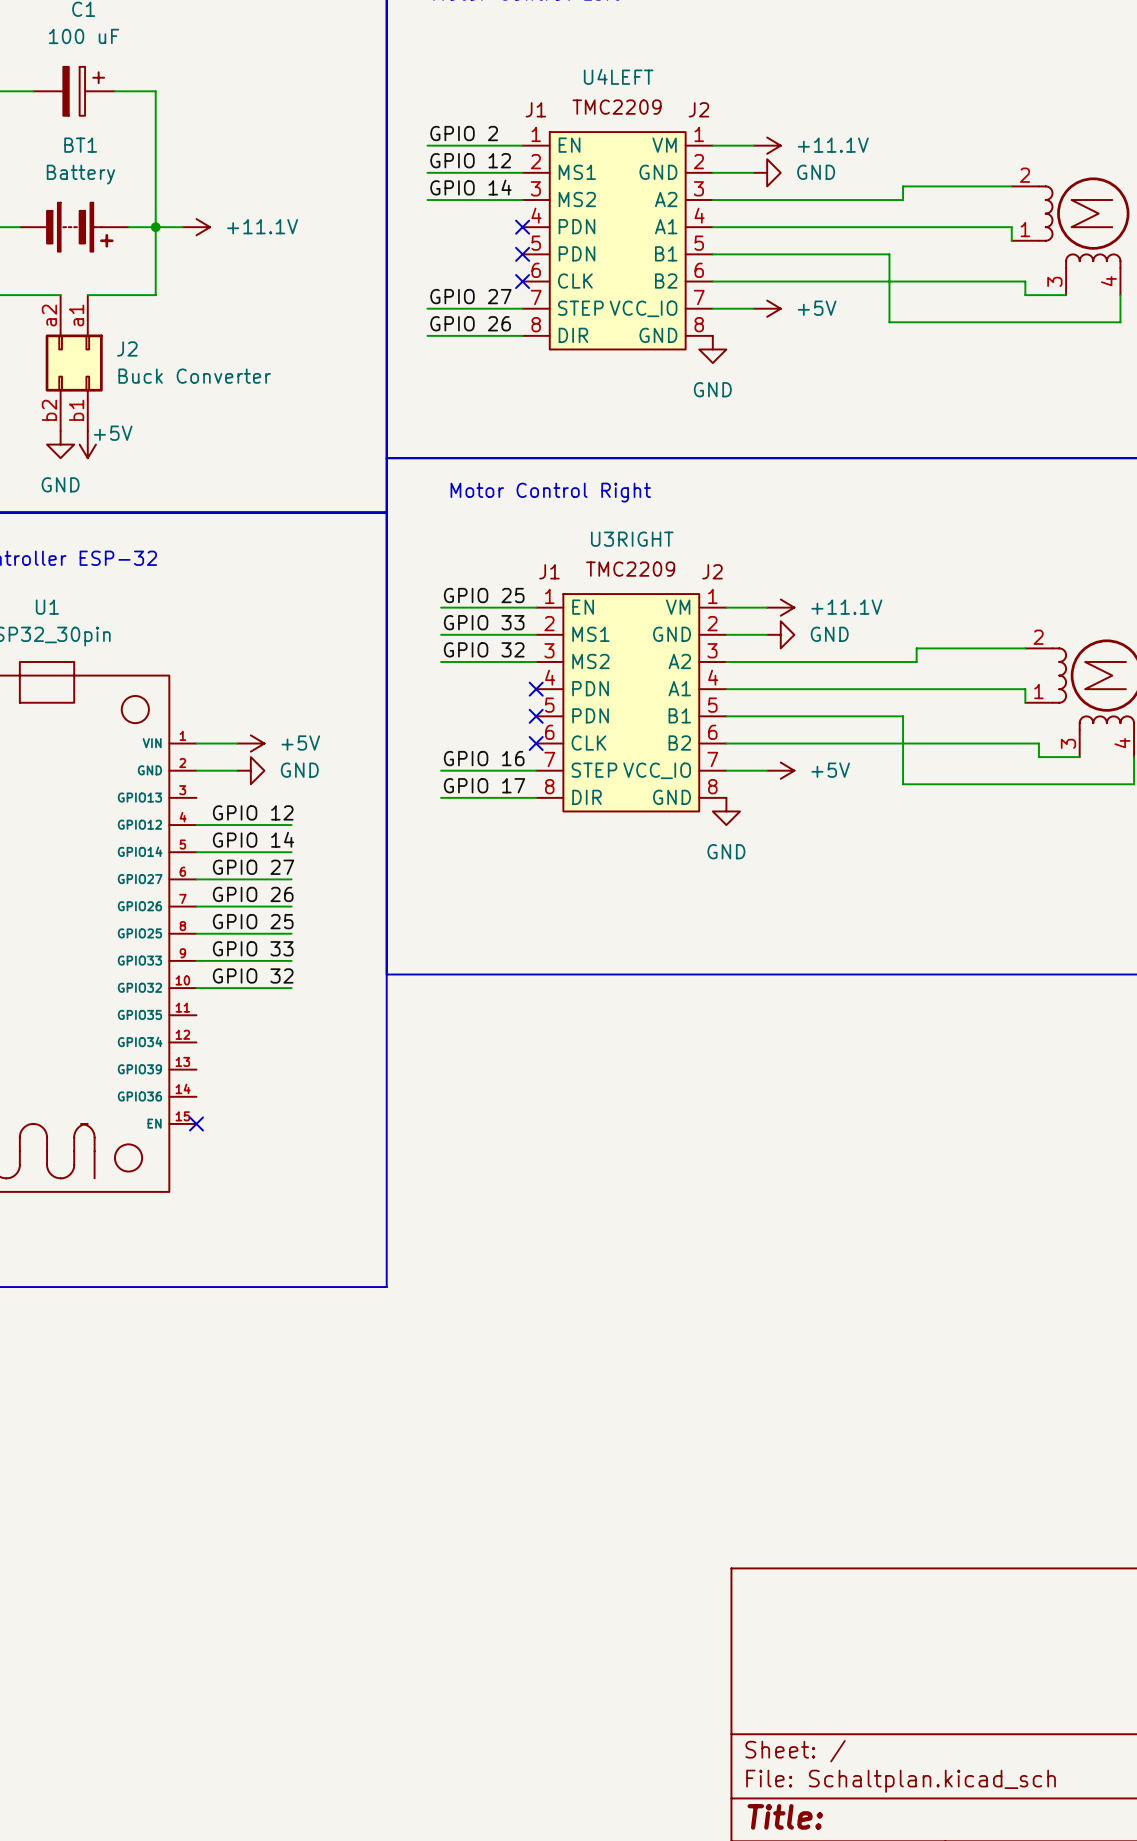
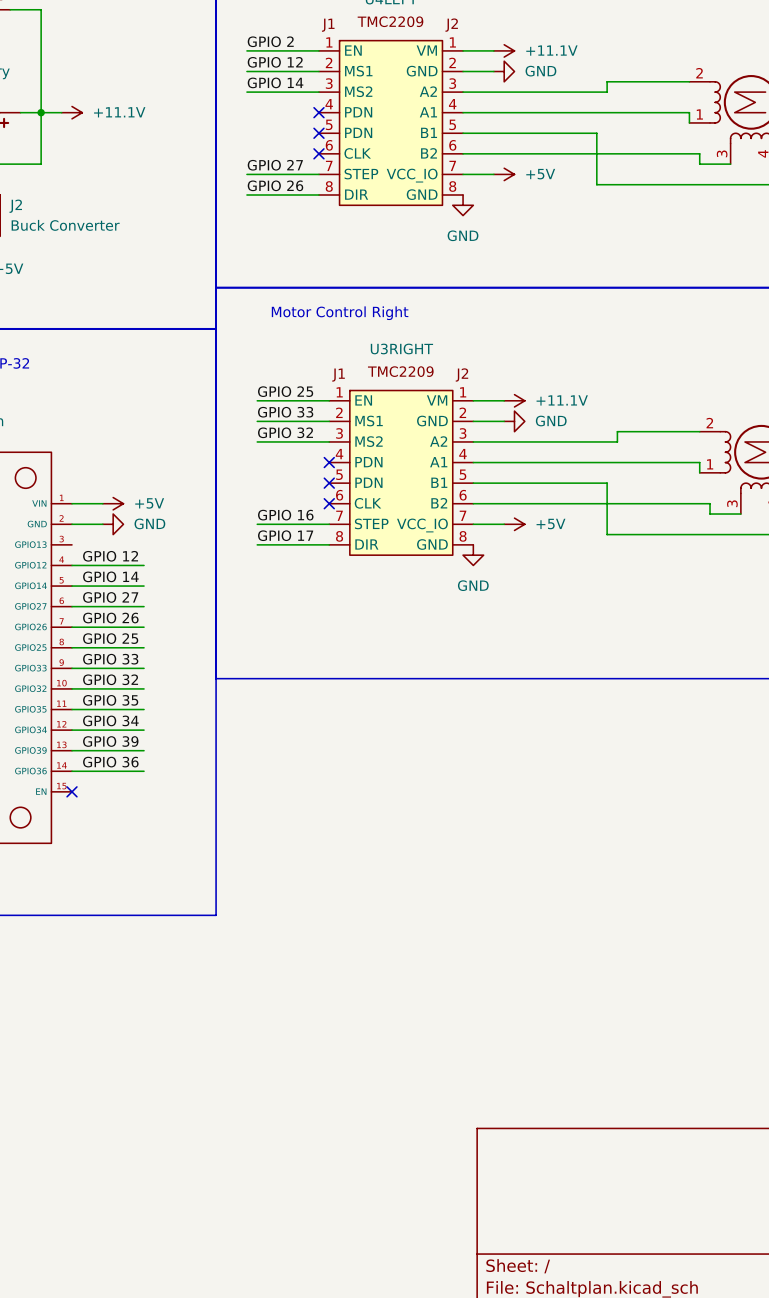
label: none -> GPIO 35 (110, 700)
wire: none -> (72, 709) (144, 709)
label: none -> GPIO 34 (110, 720)
wire: none -> (72, 730) (144, 730)
label: none -> GPIO 39 (110, 741)
wire: none -> (72, 750) (144, 750)
label: none -> GPIO 36 (110, 762)
wire: none -> (72, 771) (144, 771)

